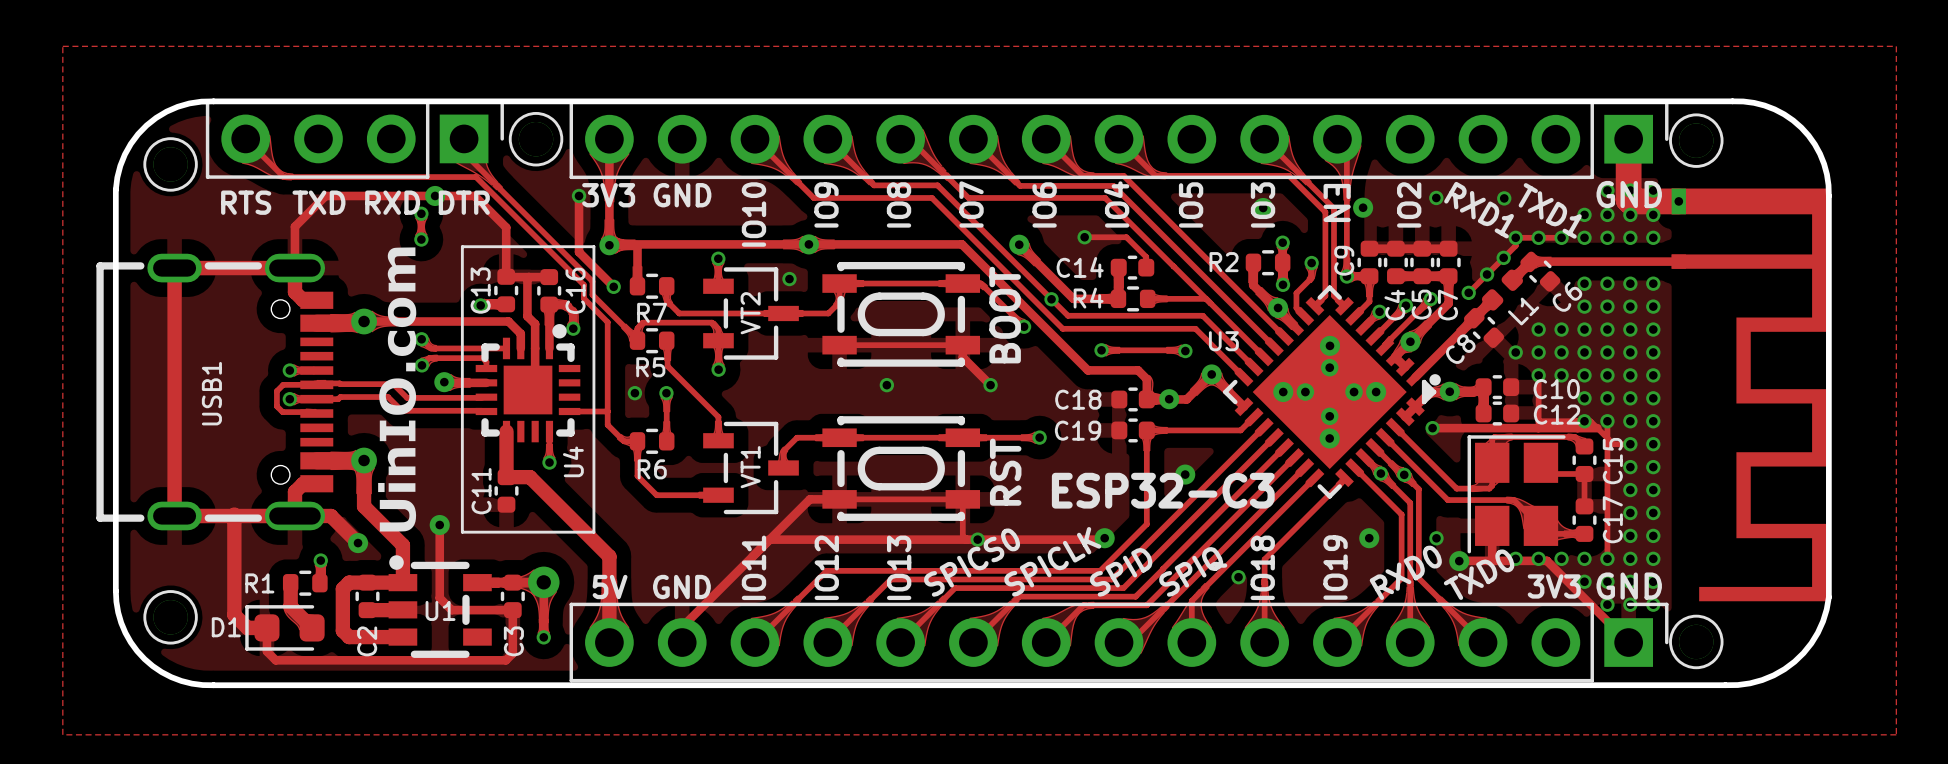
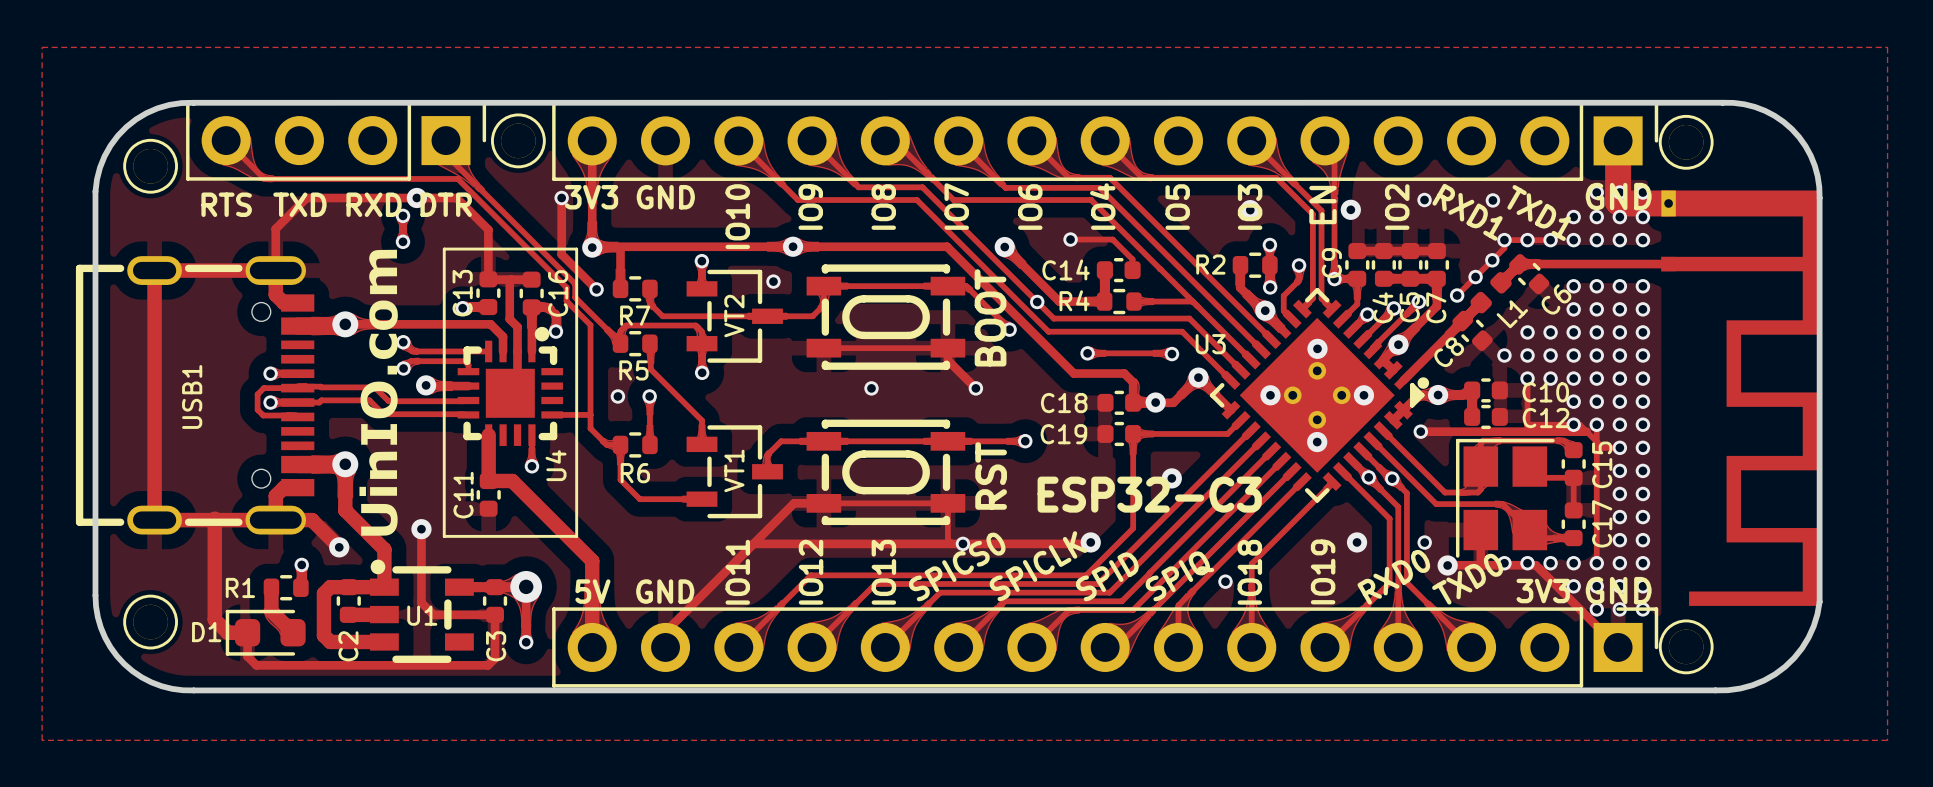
text rotation: 0° (1337, 202) -> 180° (1322, 205)

